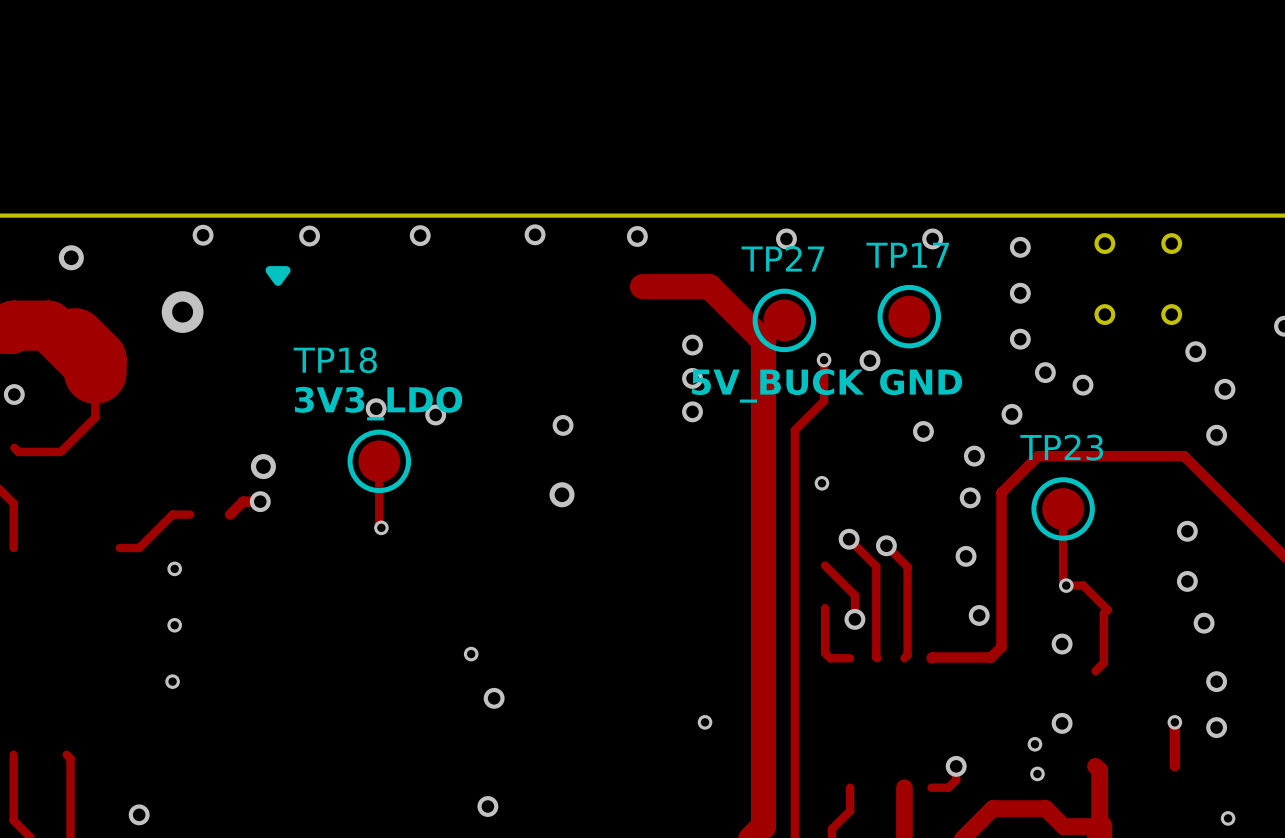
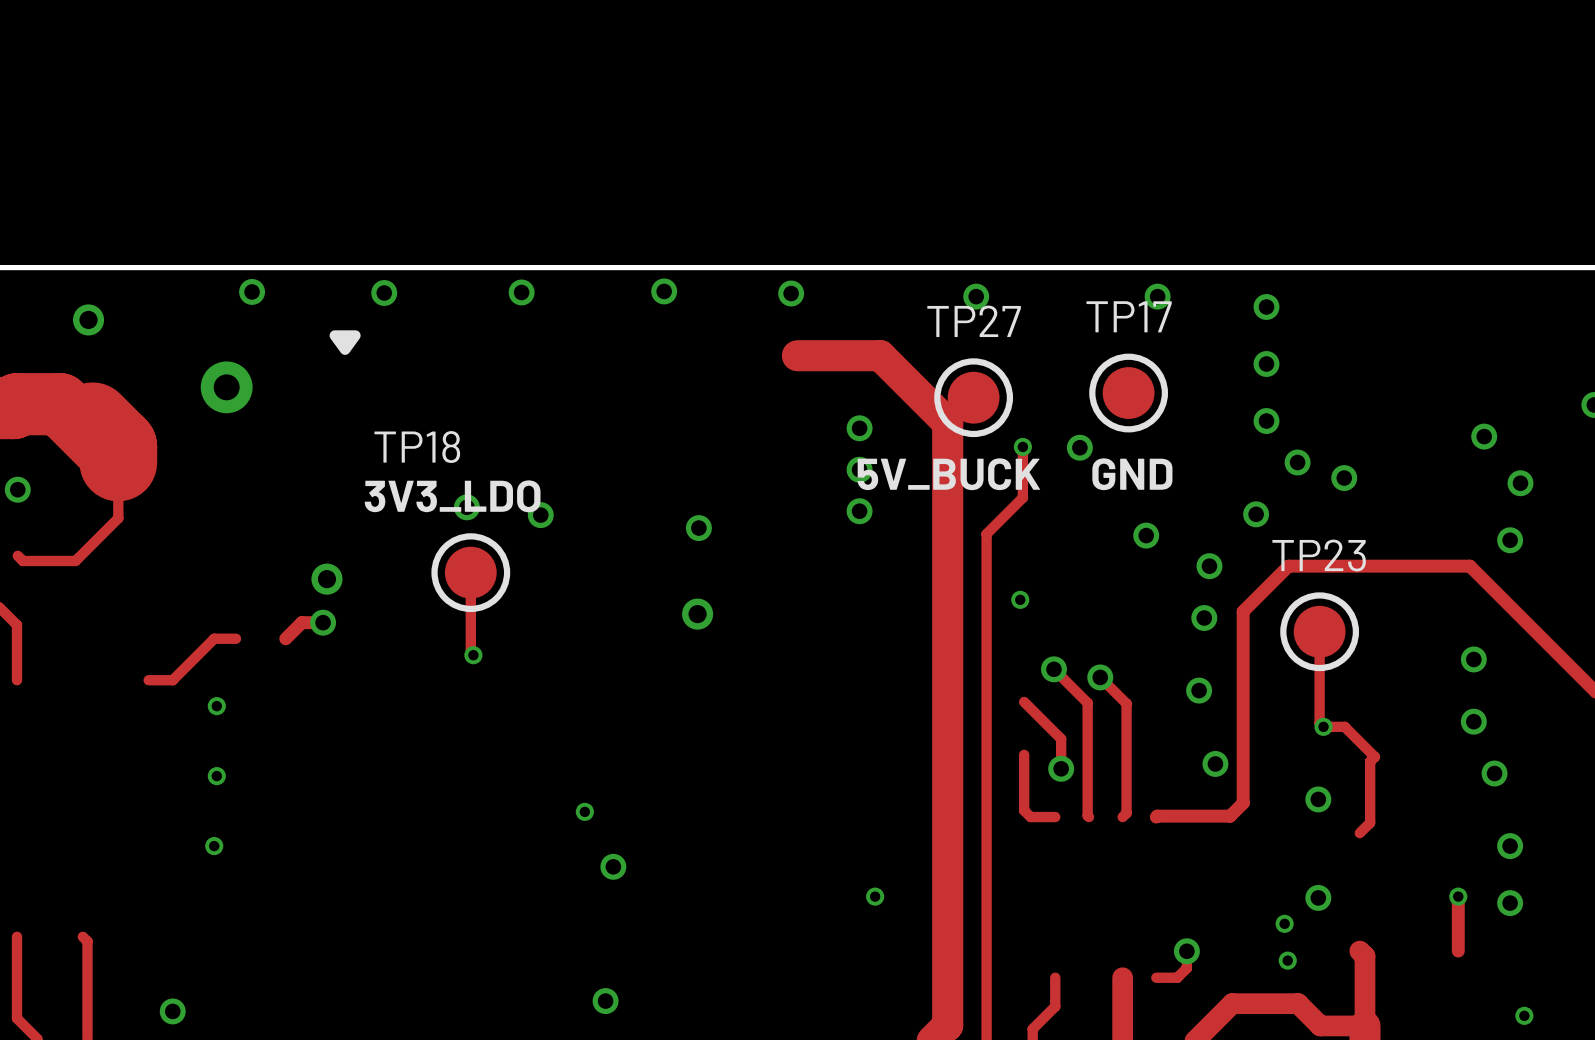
part: (1138, 279) -> none

